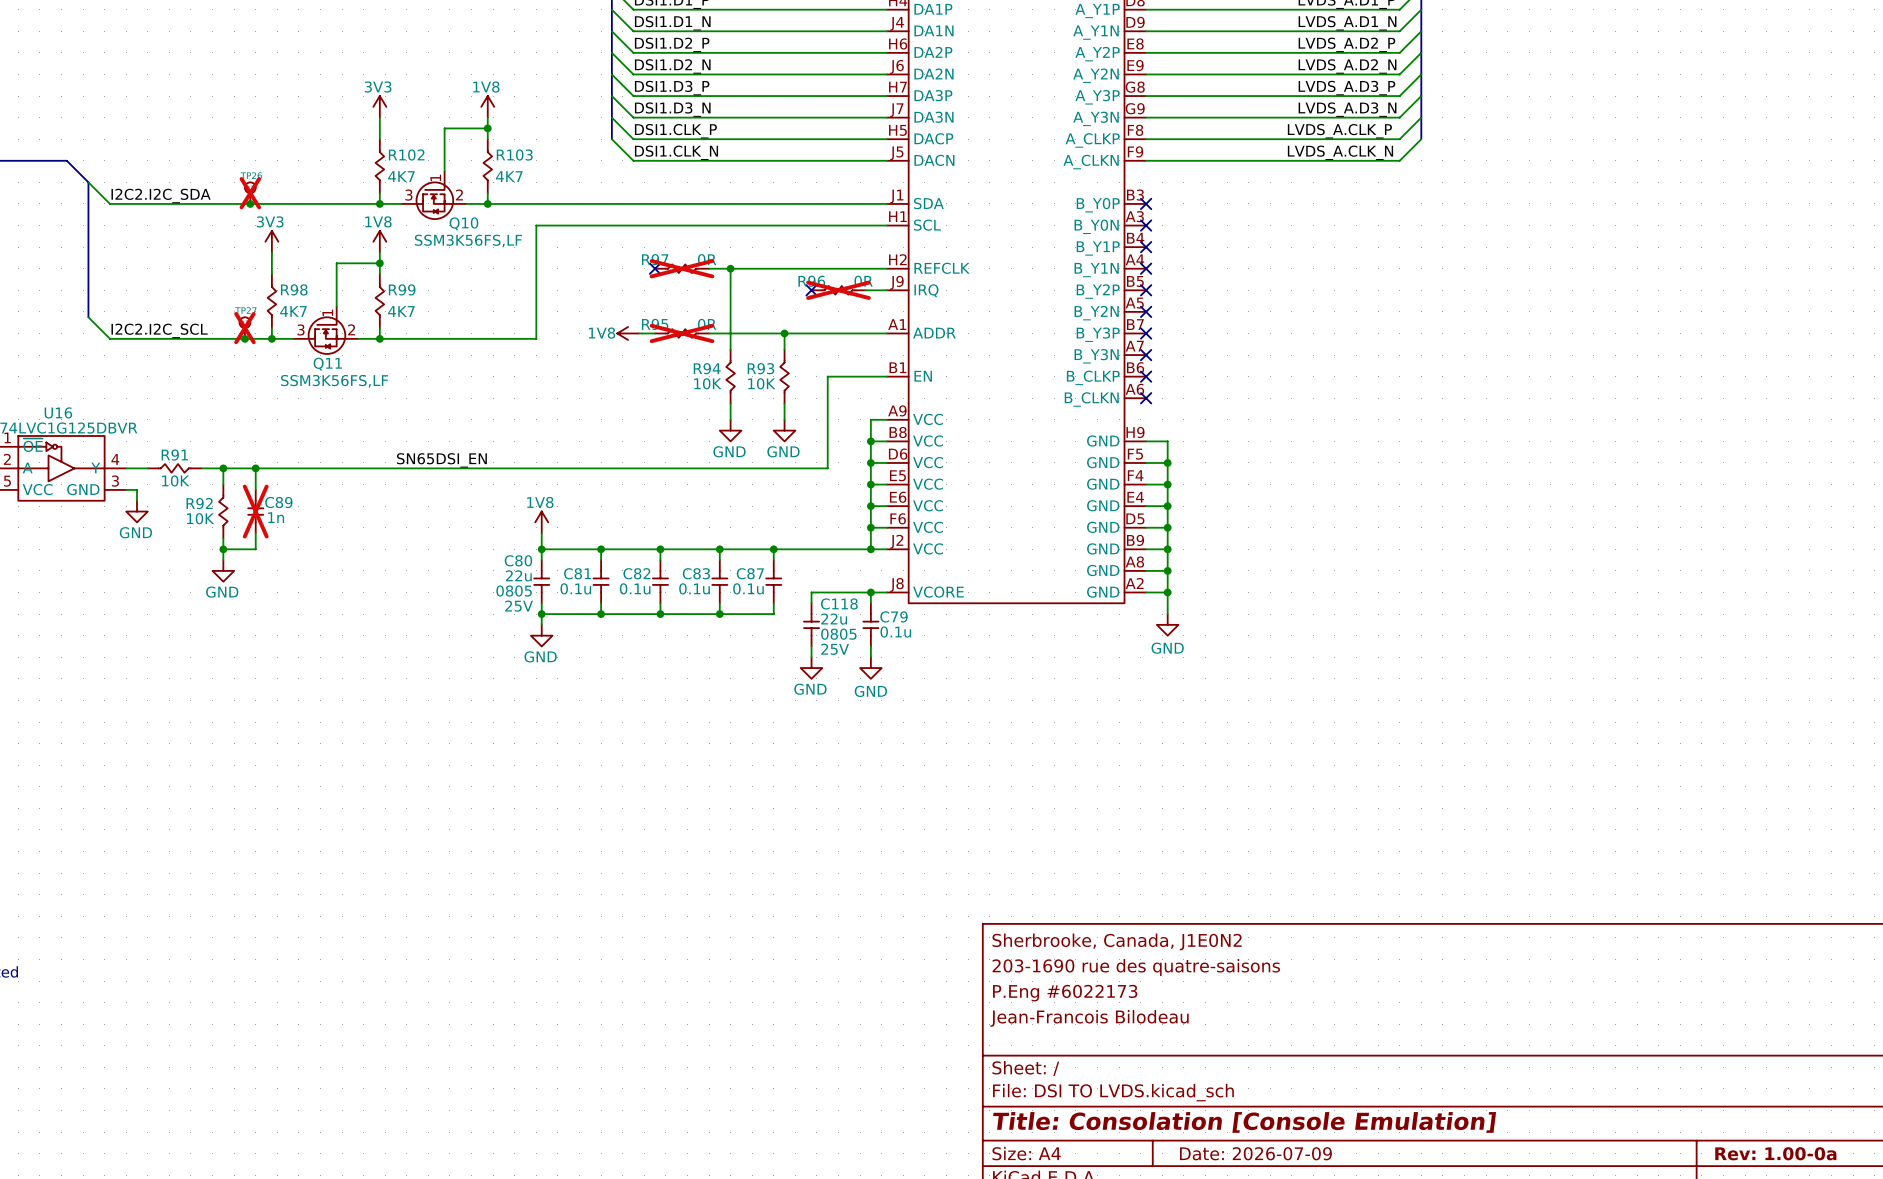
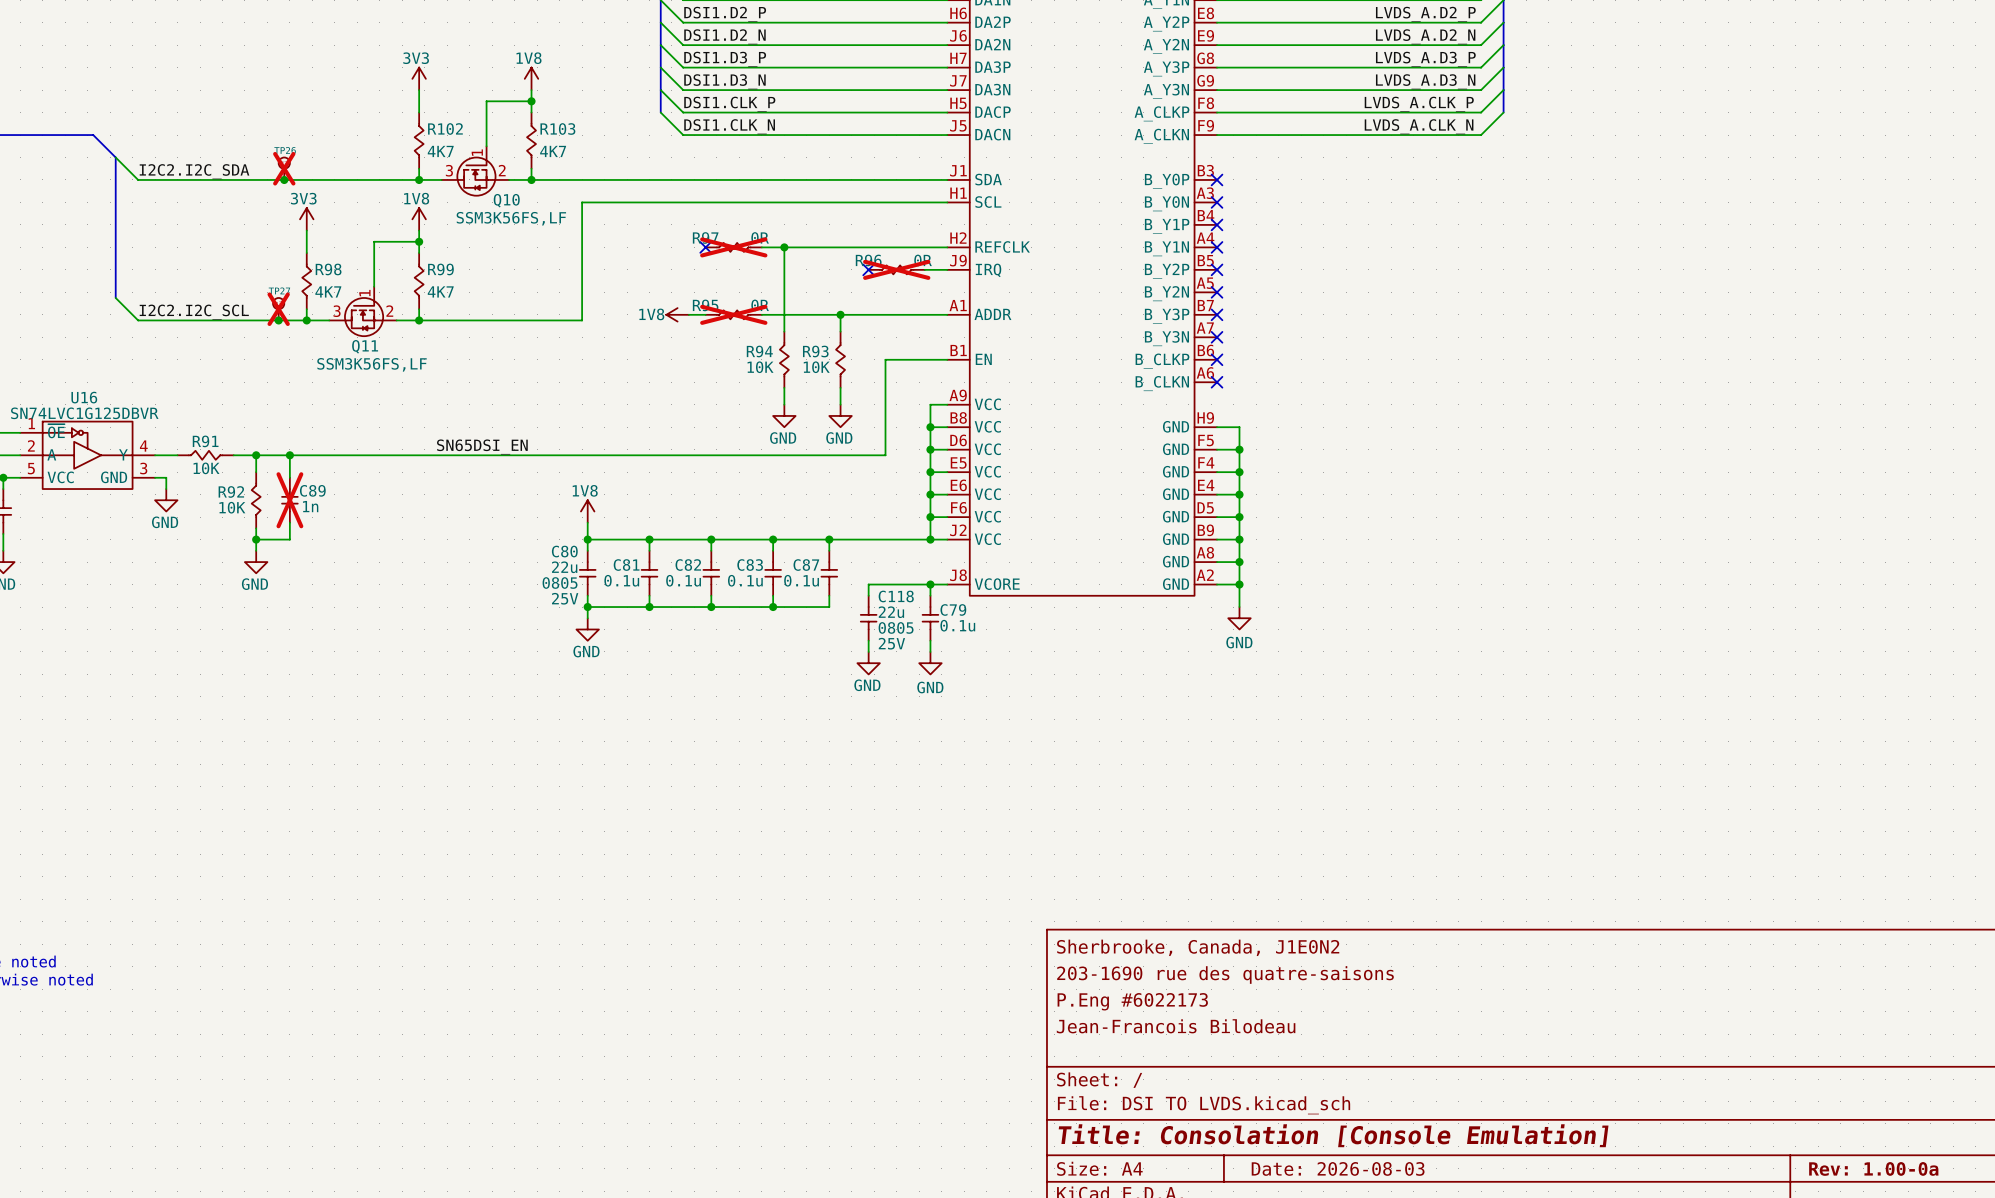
title block: Date: 2026-07-09 (1255, 1153) -> Date: 2026-08-03 (1338, 1168)

